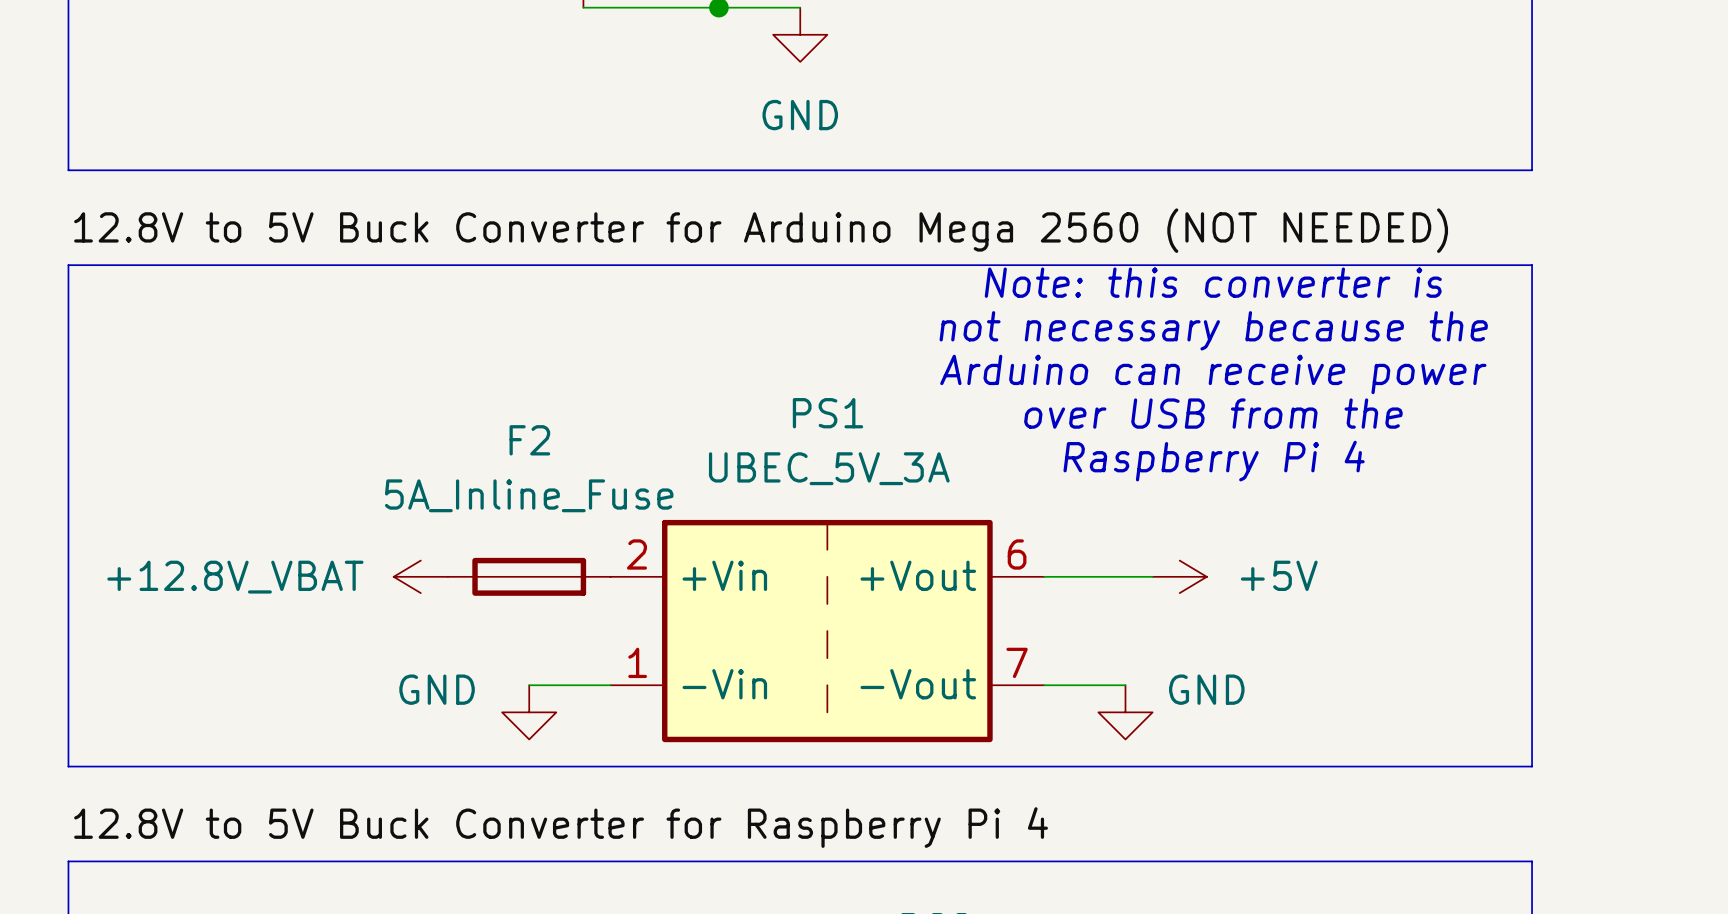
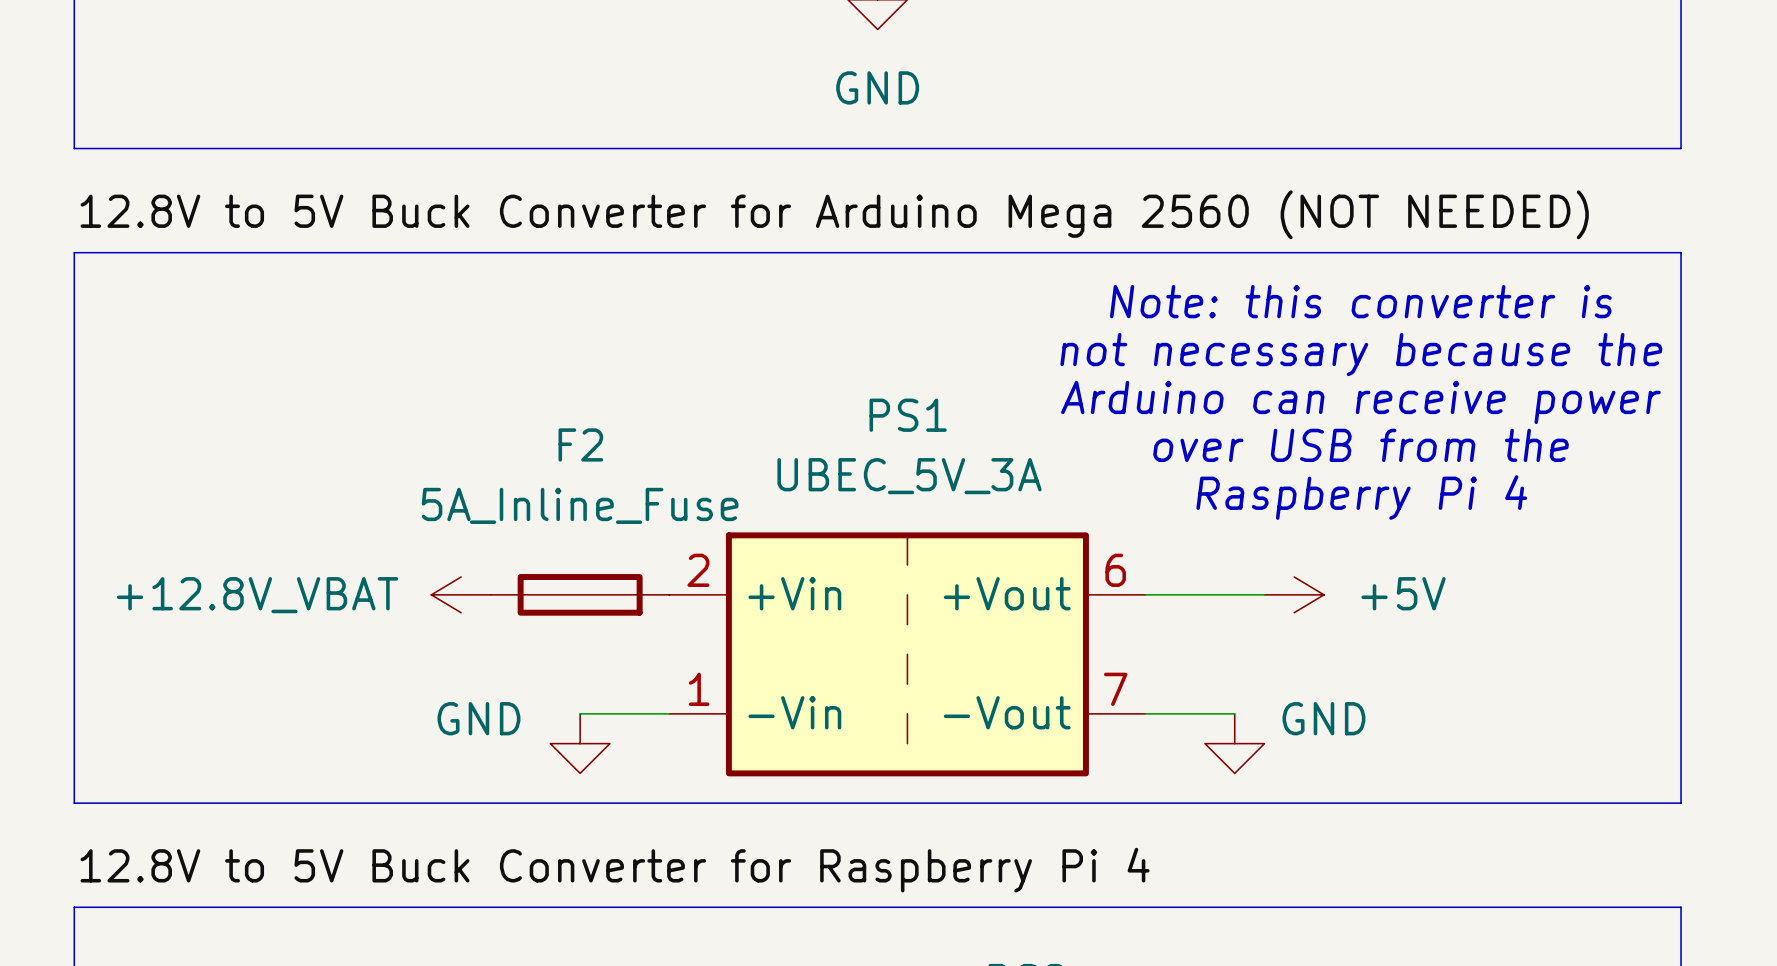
text position: Note: this converter is (1213, 282) -> Note: this converter is (1360, 301)
text position: not necessary because the (1213, 330) -> not necessary because the (1361, 354)
text position: Arduino can receive power (1213, 374) -> Arduino can receive power (1360, 402)
text position: over USB from the (1213, 413) -> over USB from the (1361, 445)
text position: Raspberry Pi 4 (1214, 461) -> Raspberry Pi 4 (1361, 497)

